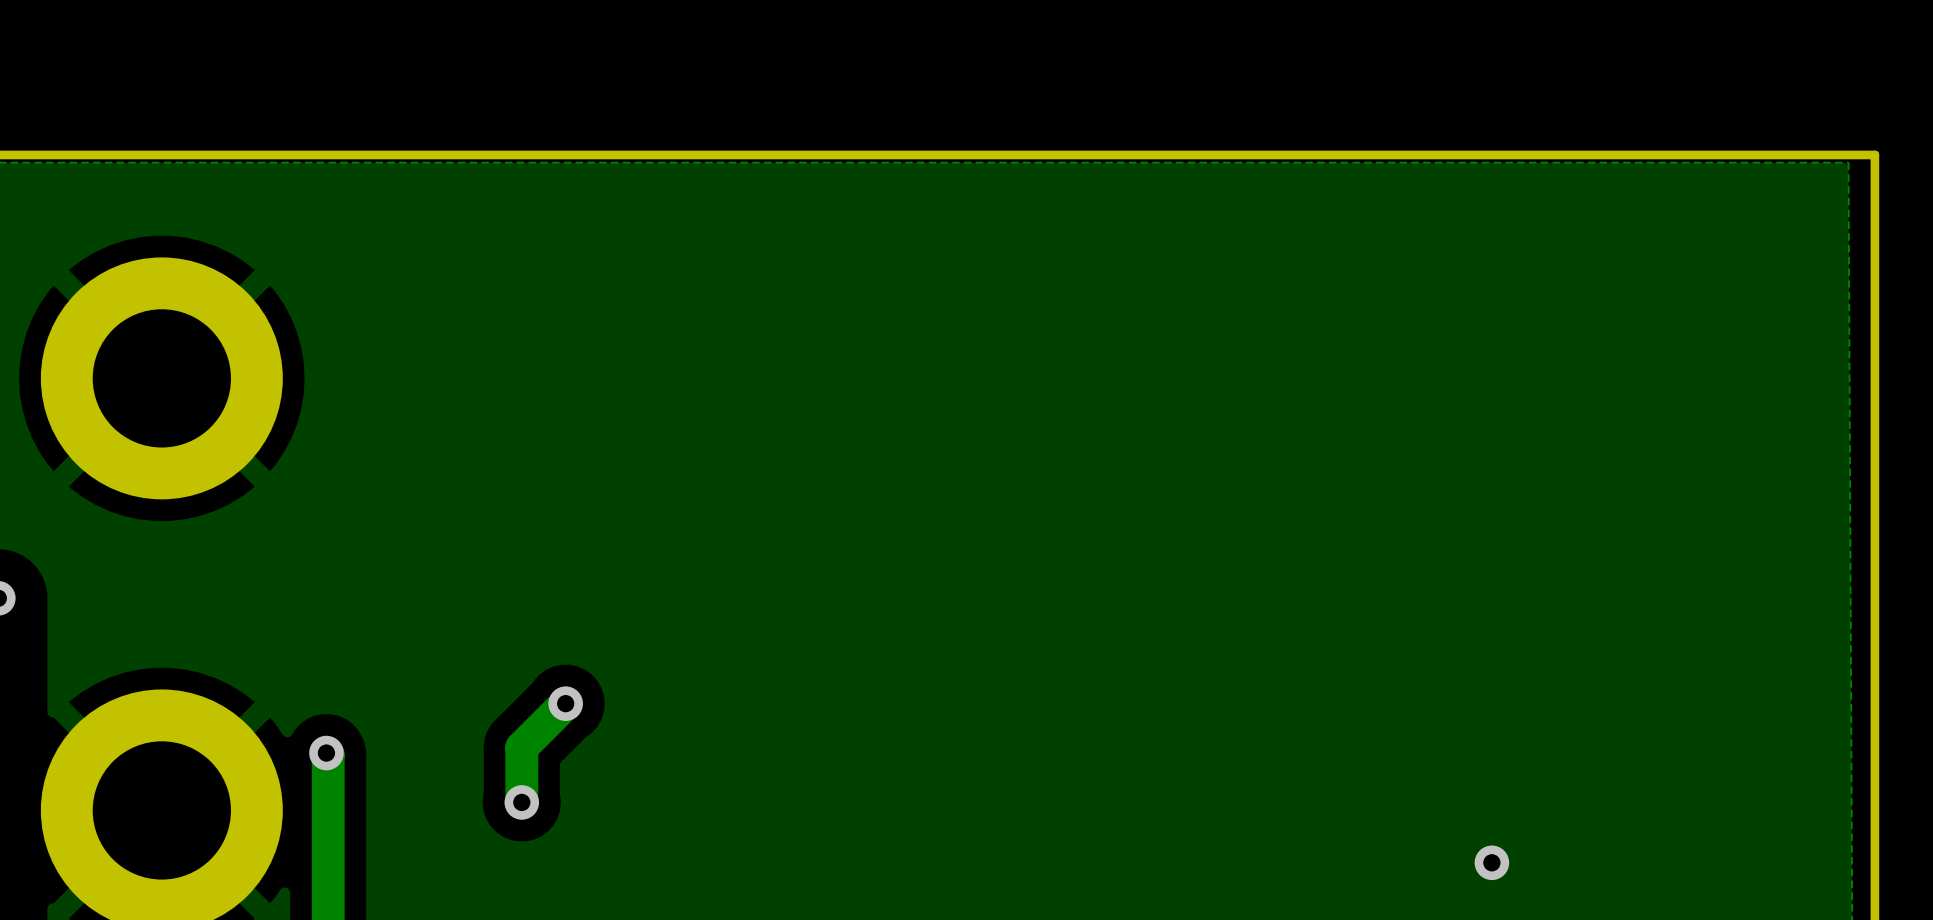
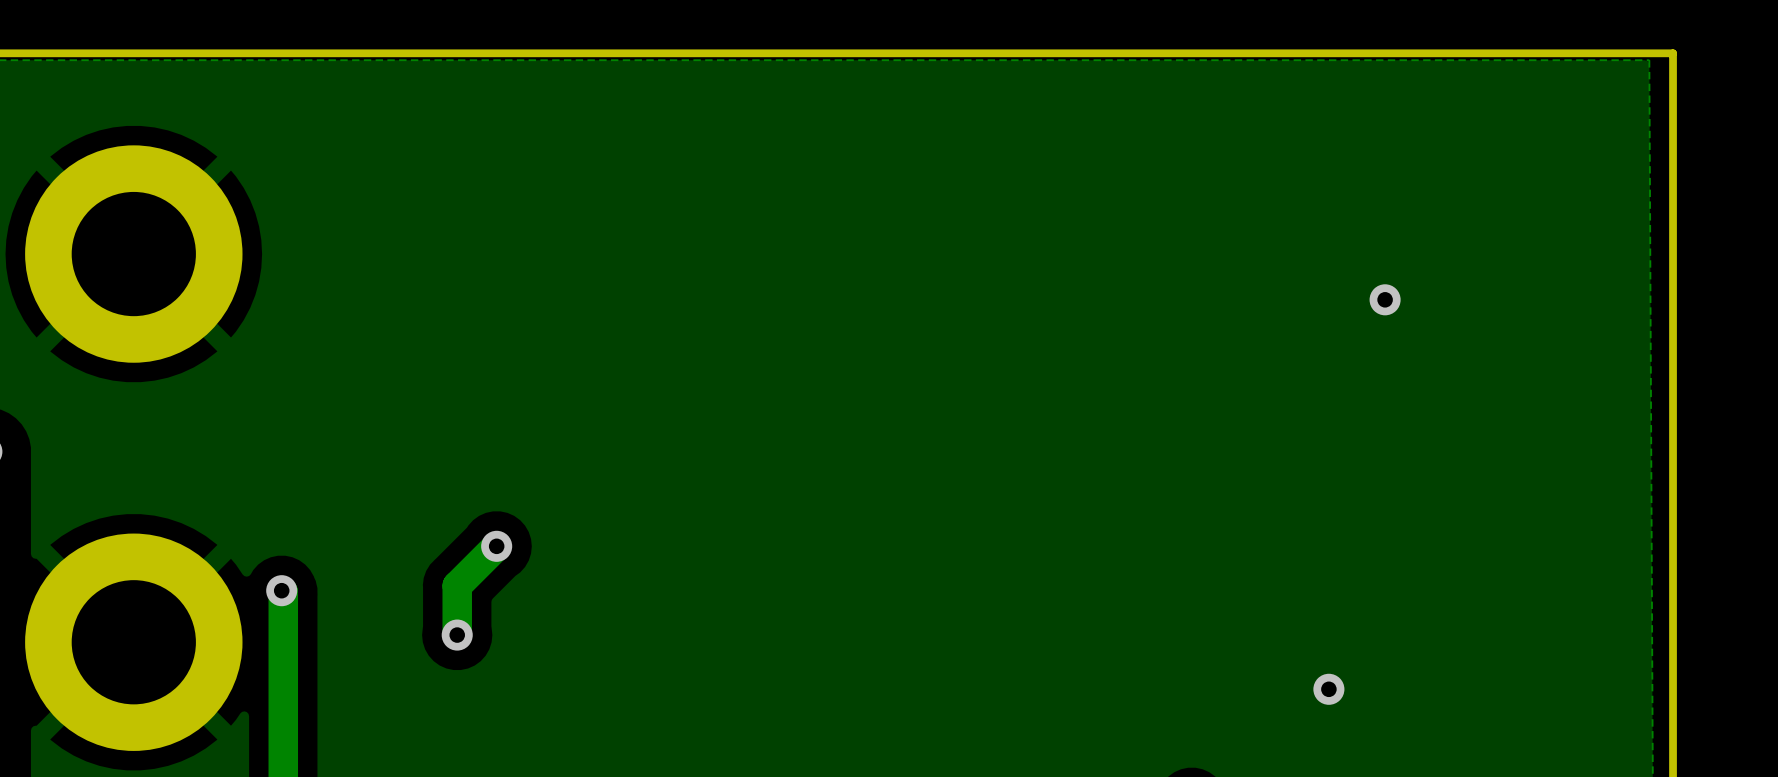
via: none -> (1385, 299)

